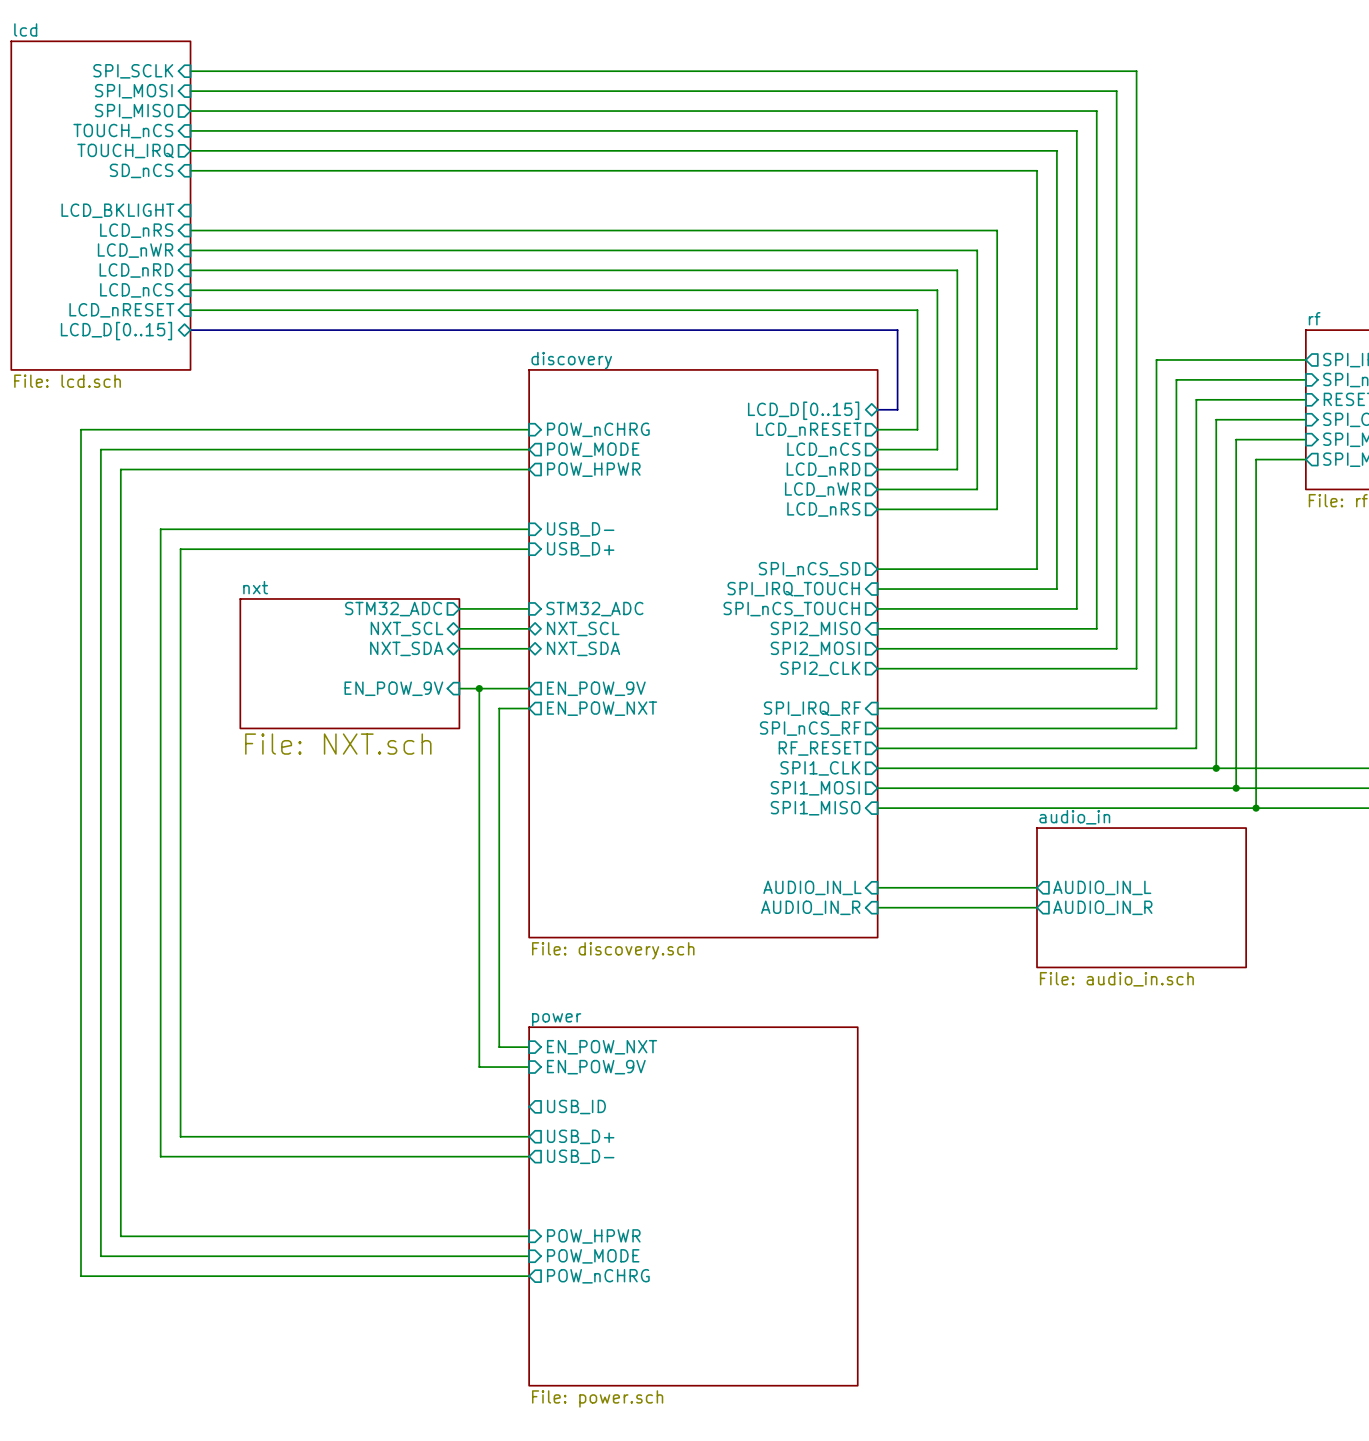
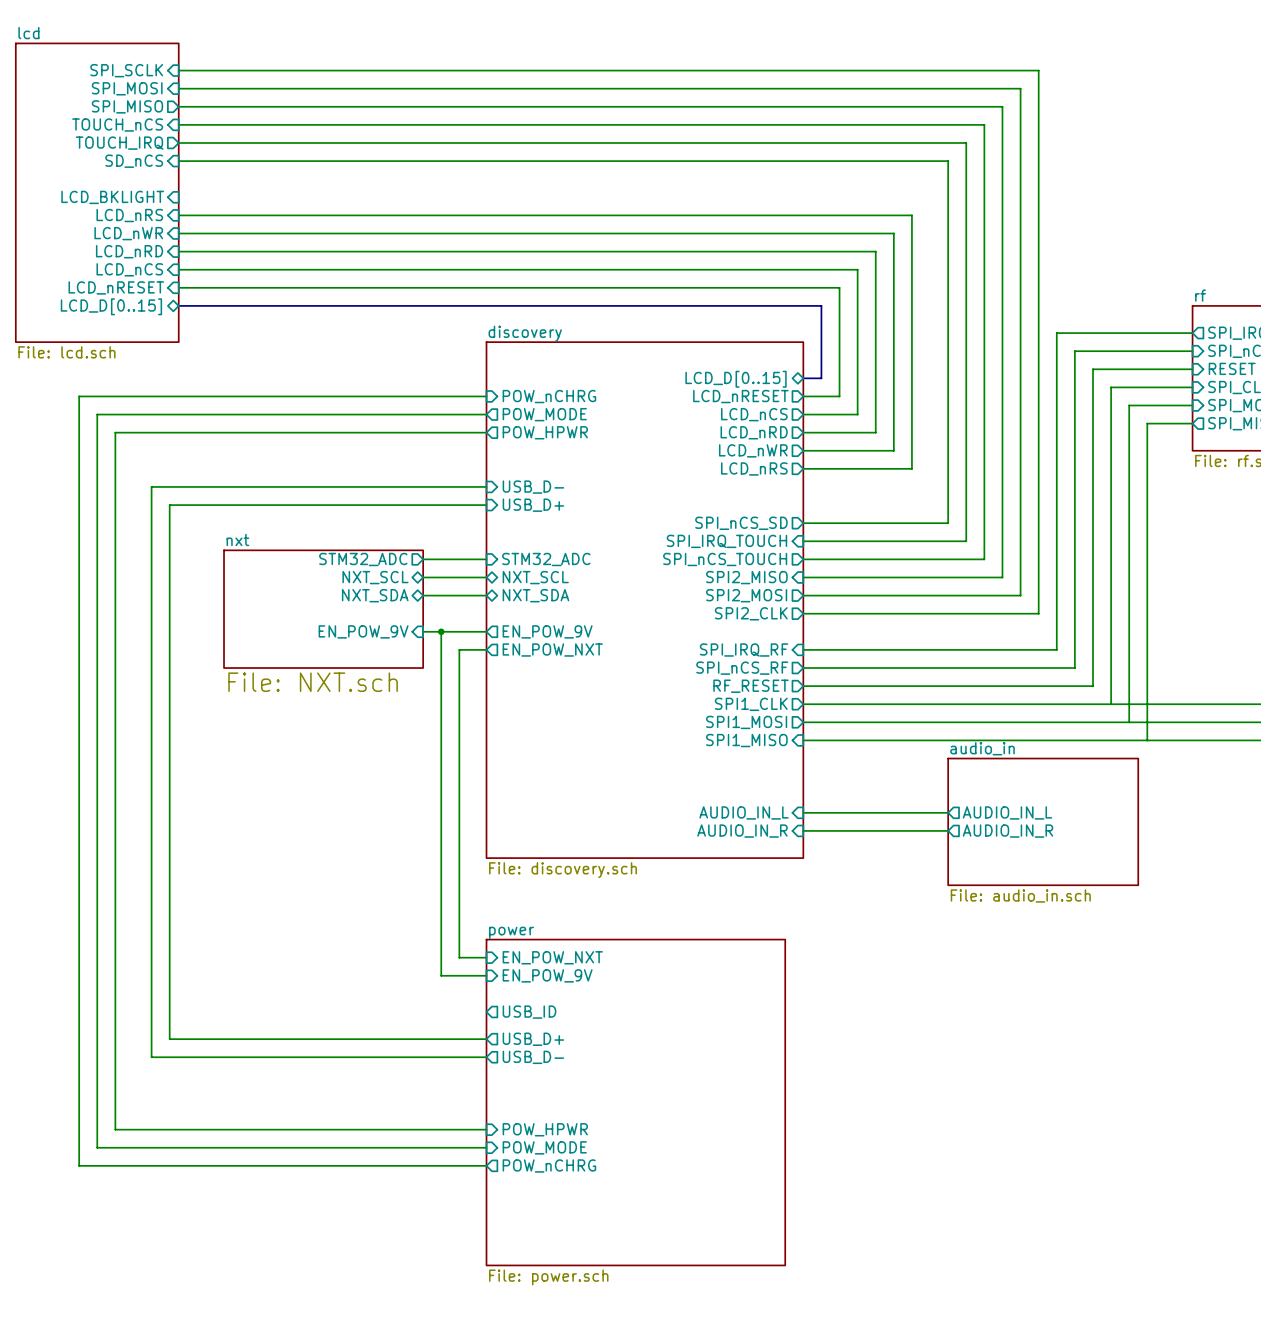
junction: (1216, 768) -> none
junction: (1236, 788) -> none
junction: (1256, 808) -> none

